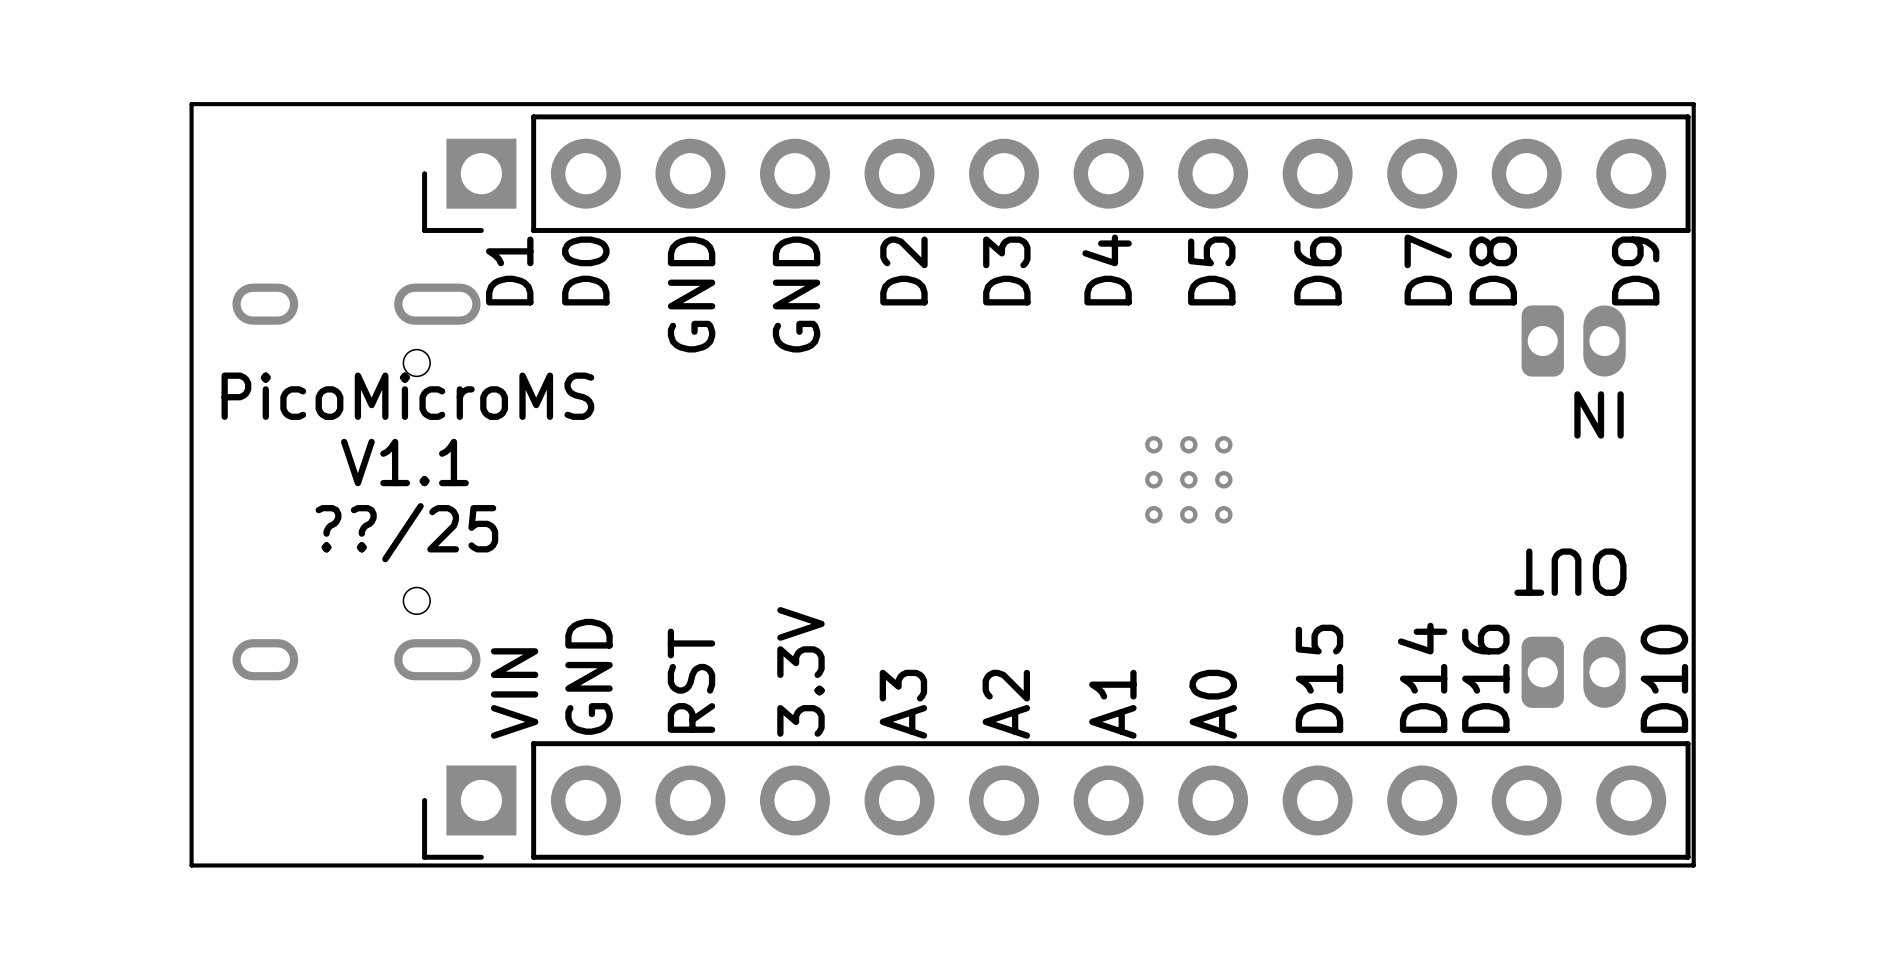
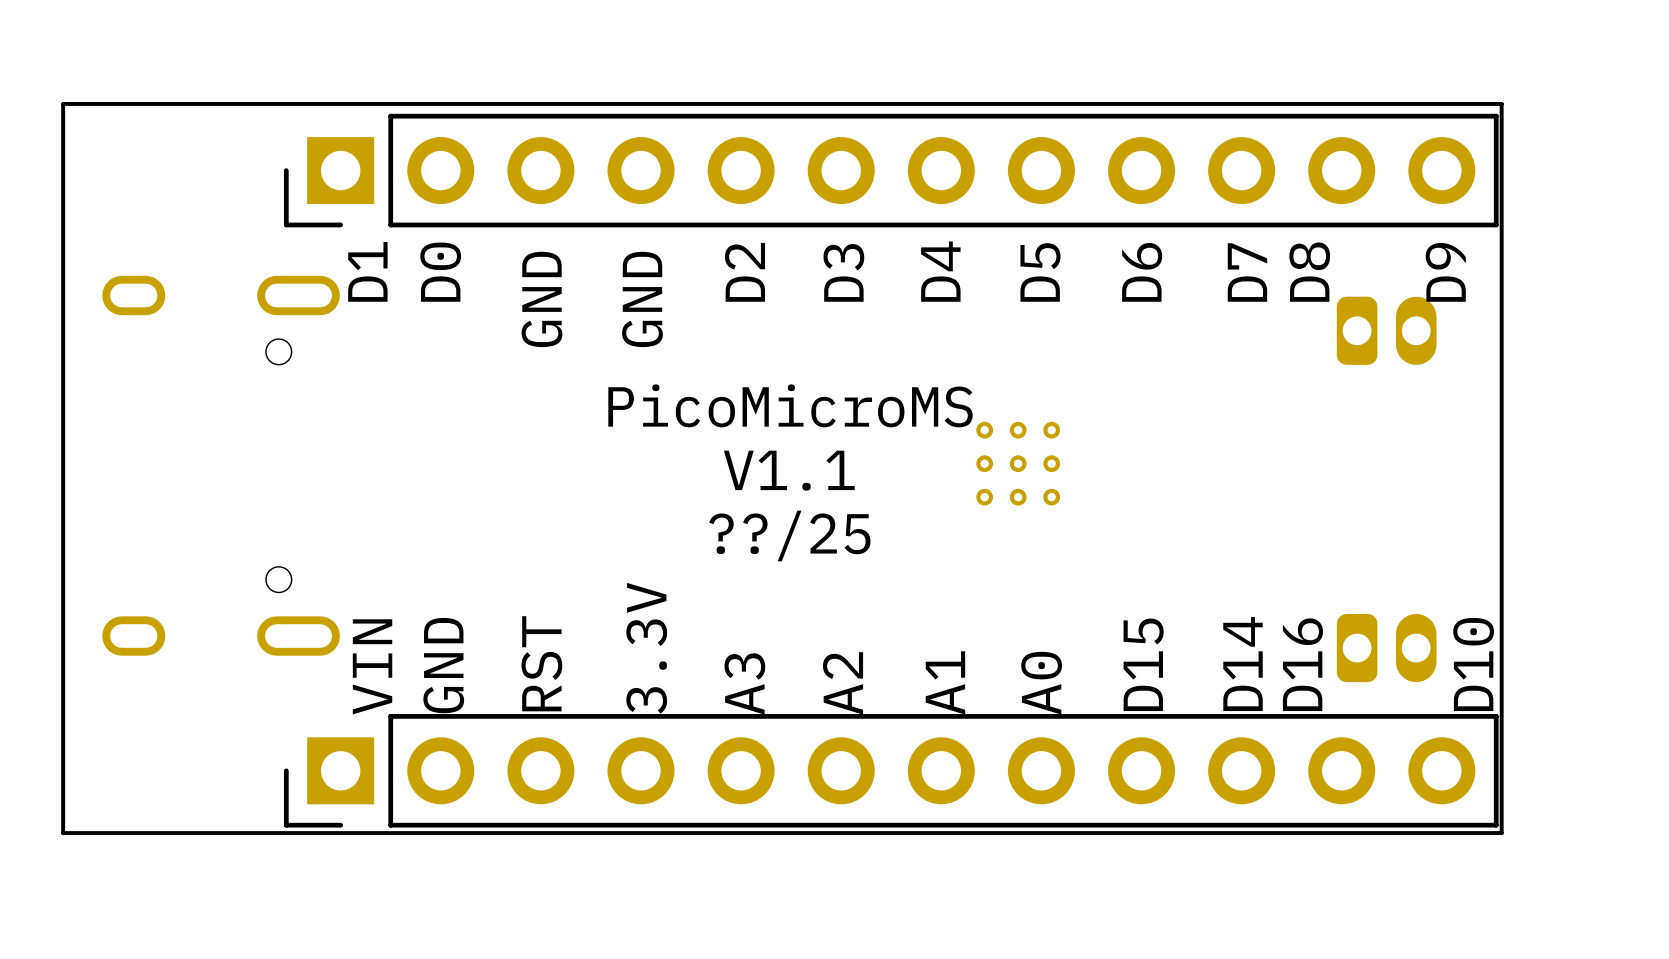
text position: PicoMicroMS (407, 396) -> PicoMicroMS (790, 405)
text: IN (1599, 414) -> none
text position: V1.1 (404, 462) -> V1.1 (789, 470)
text position: ??/25 (406, 532) -> ??/25 (789, 535)
text: OUT (1570, 572) -> none

